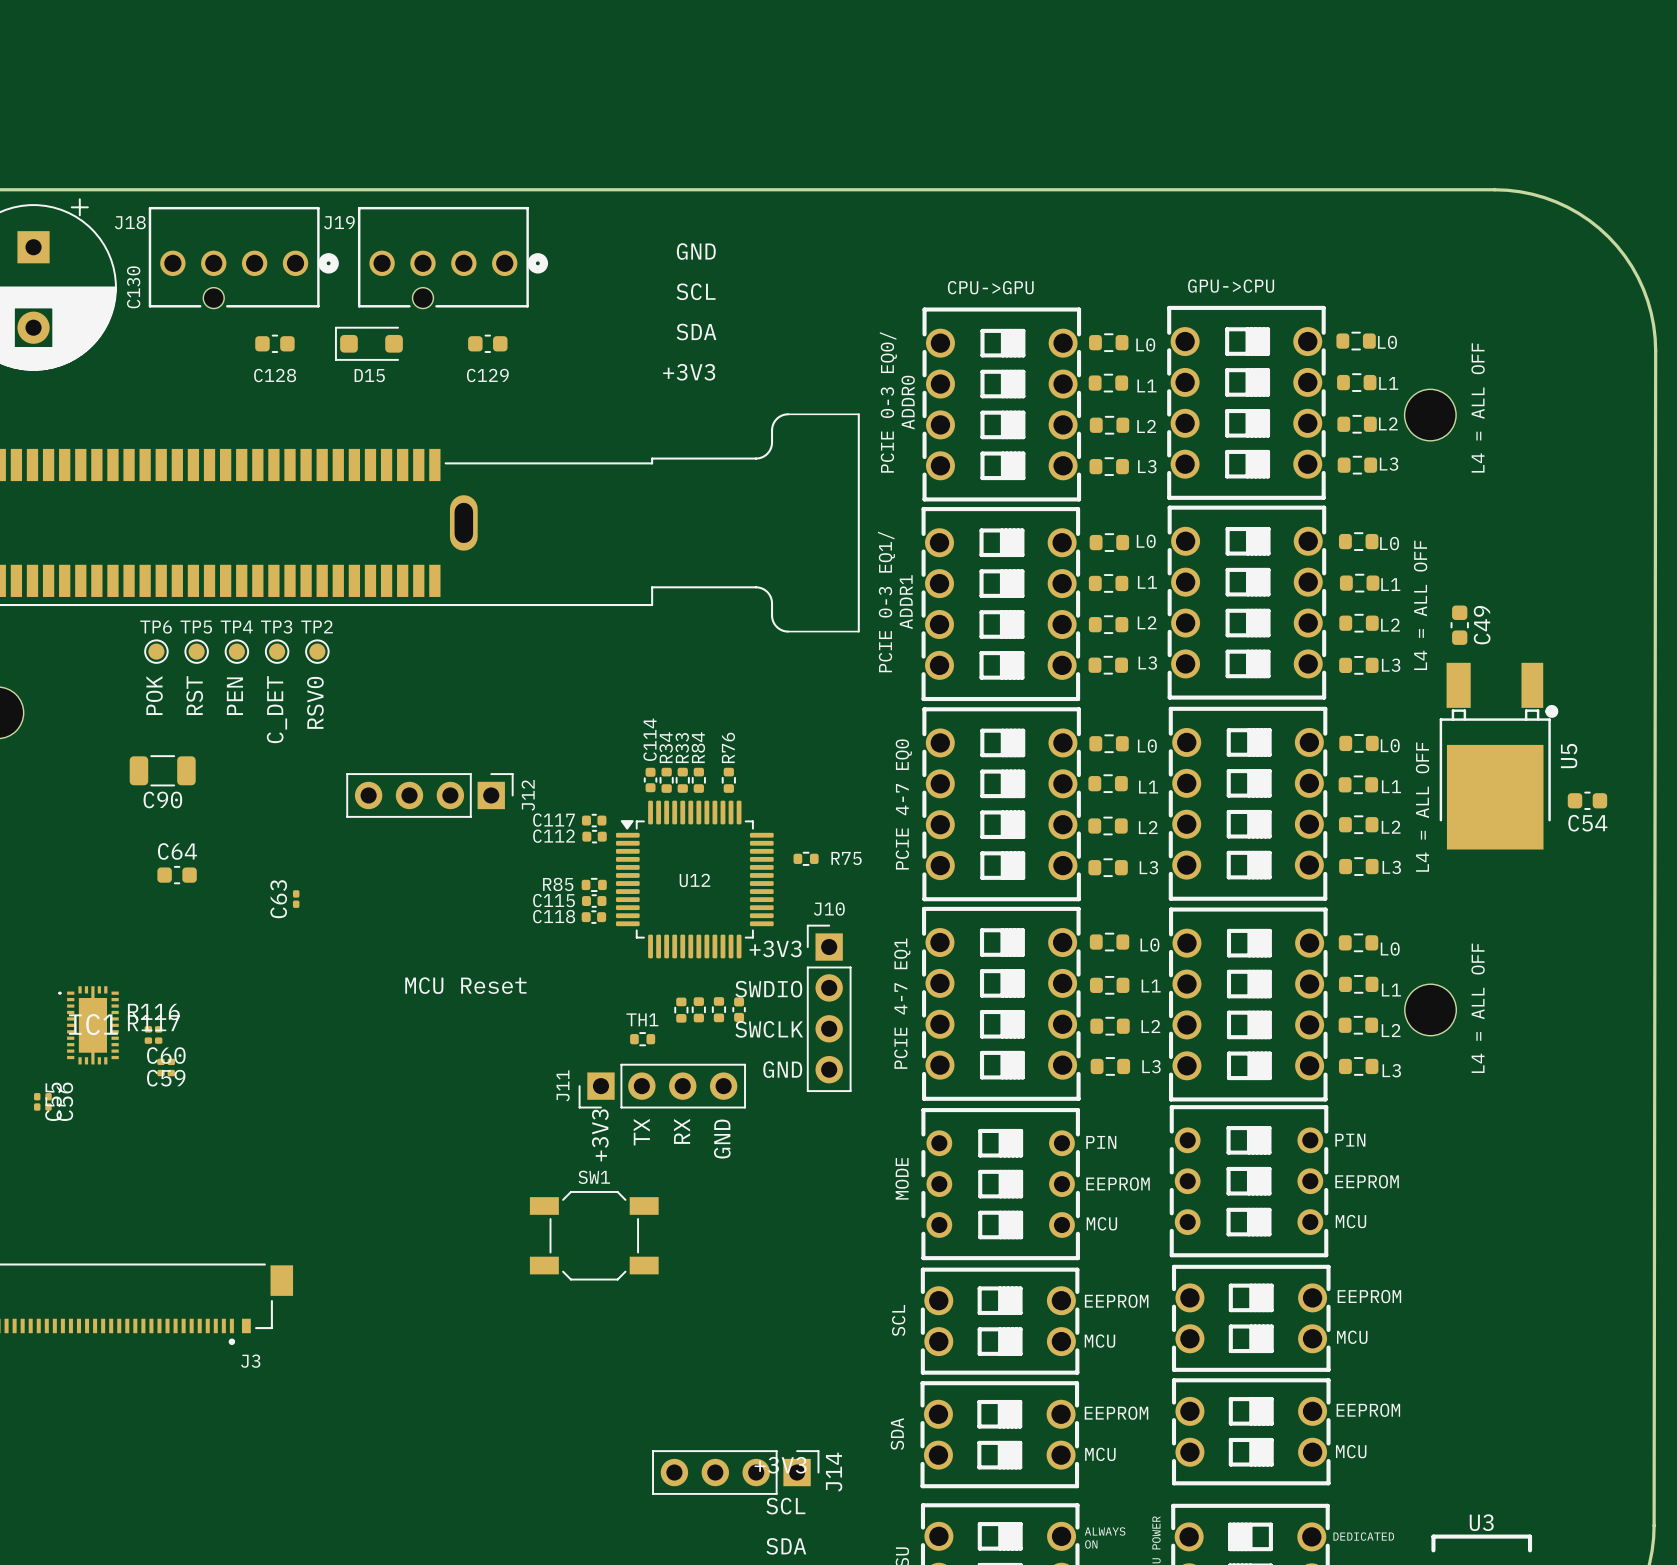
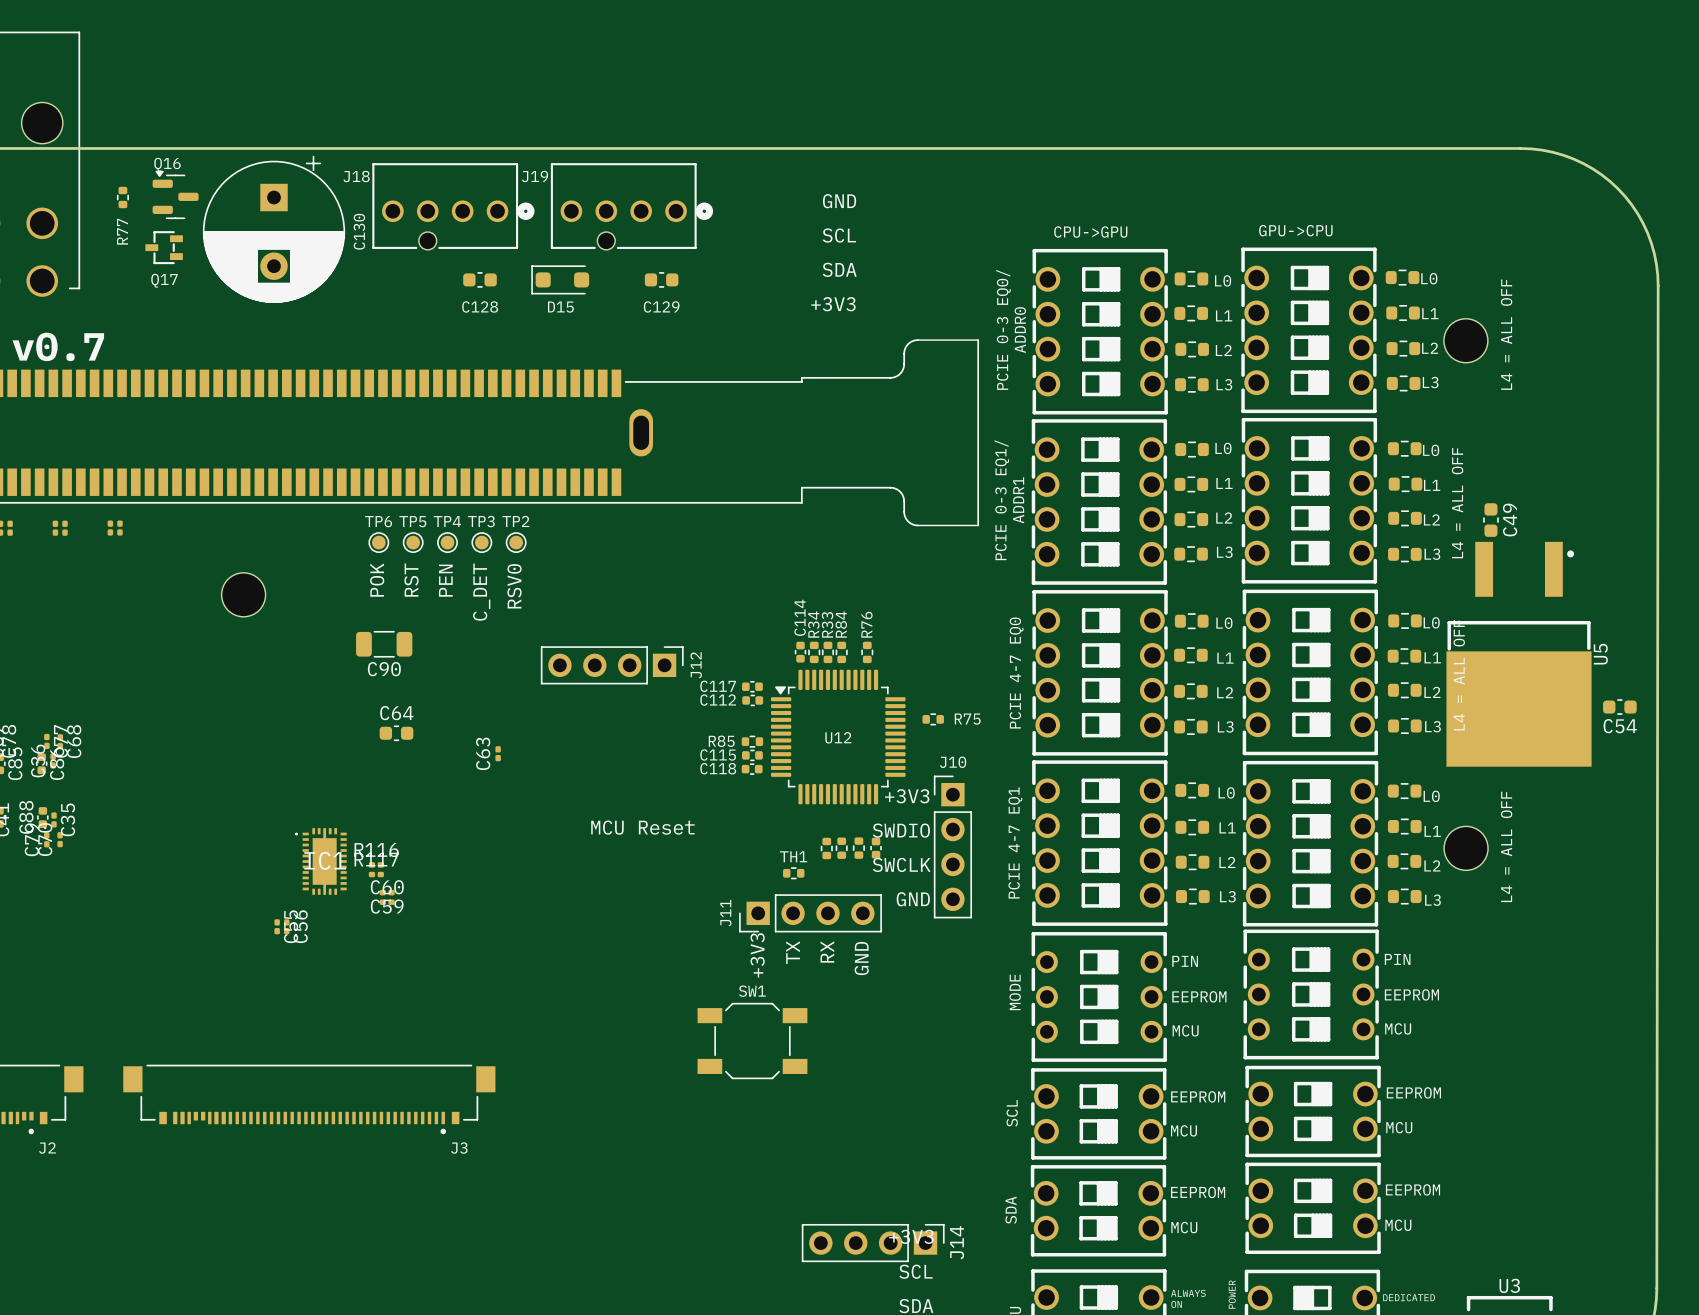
U5 footprint: [1439, 662, 1559, 850] -> [1446, 541, 1592, 767]
C54 position: (1587, 800) -> (1619, 707)

